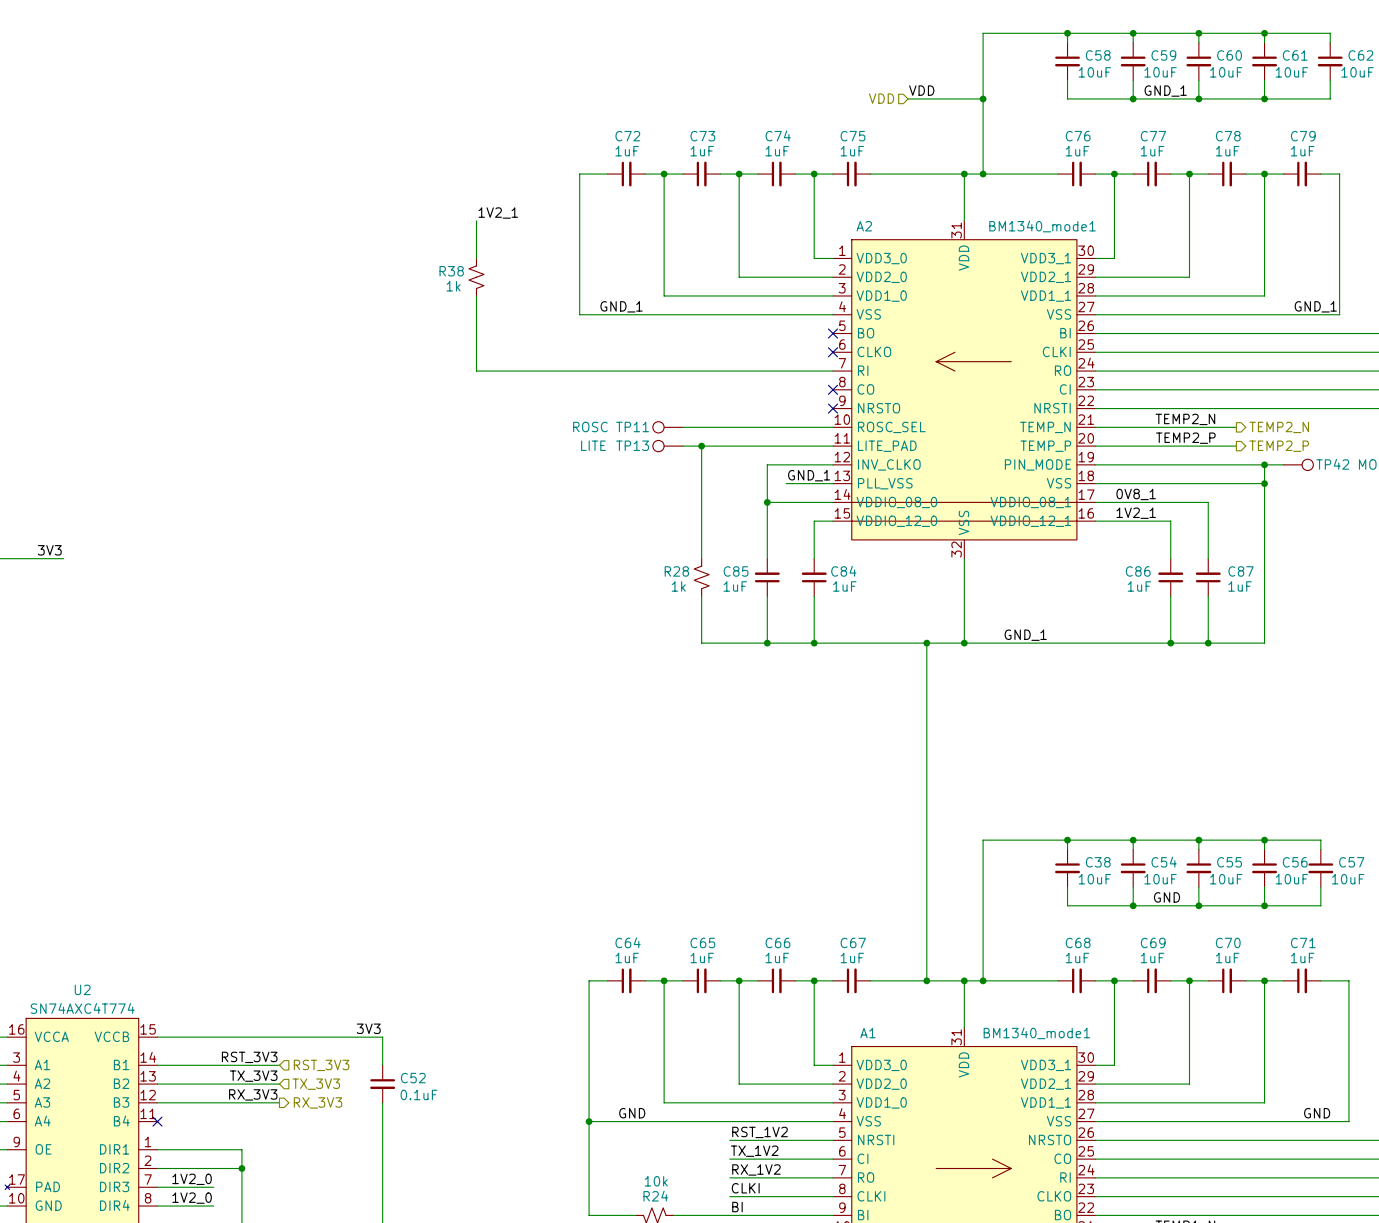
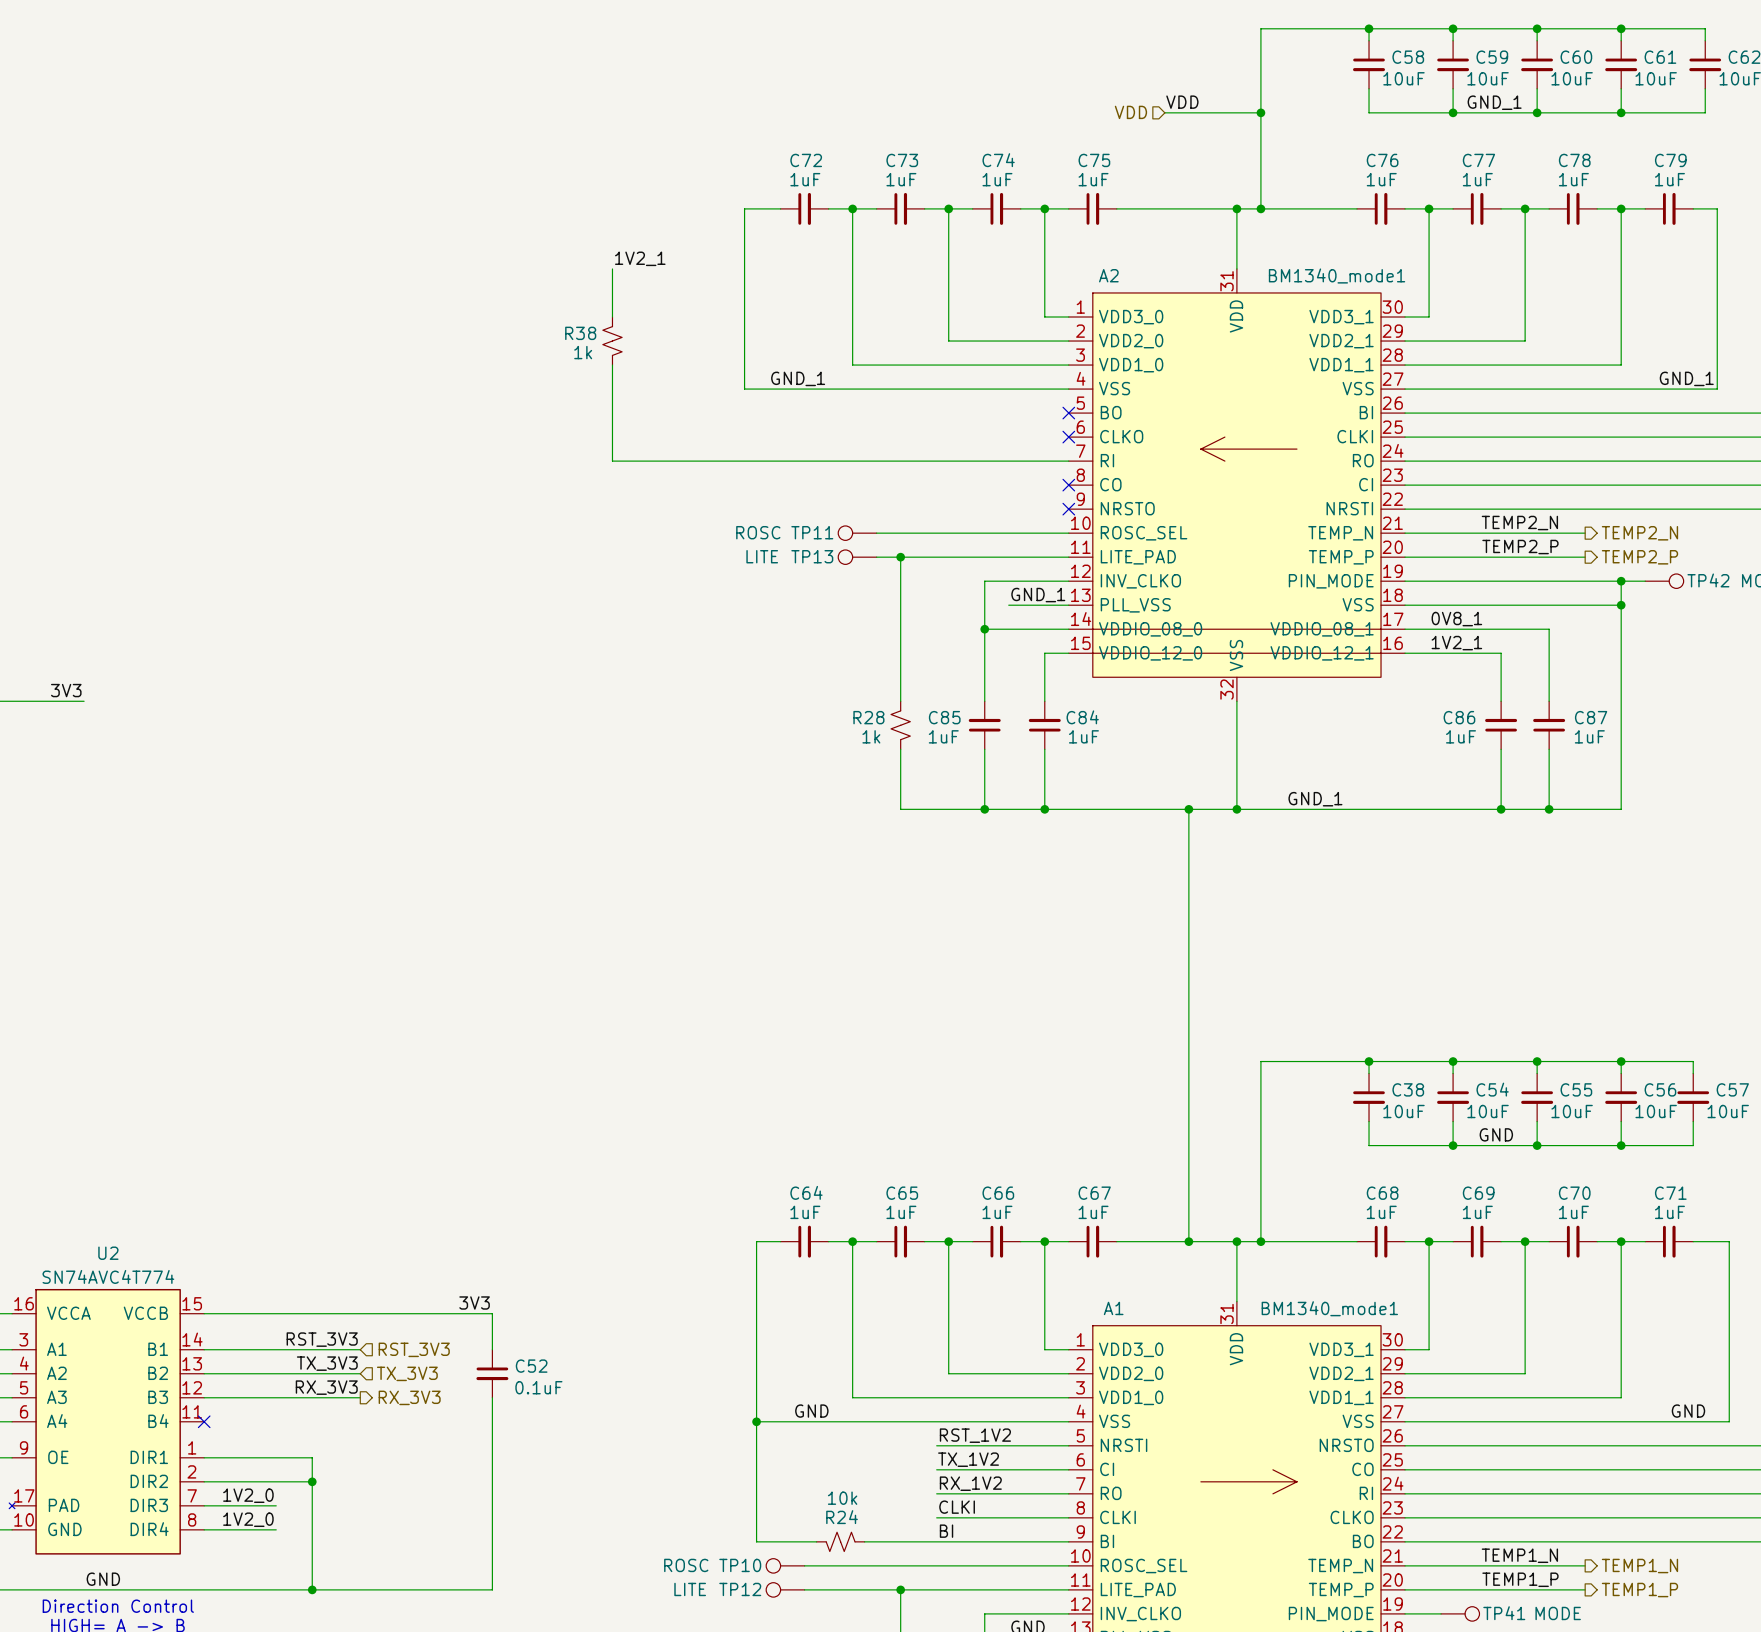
U2 value: SN74AXC4T774 (82, 1008) -> SN74AVC4T774 (108, 1276)

